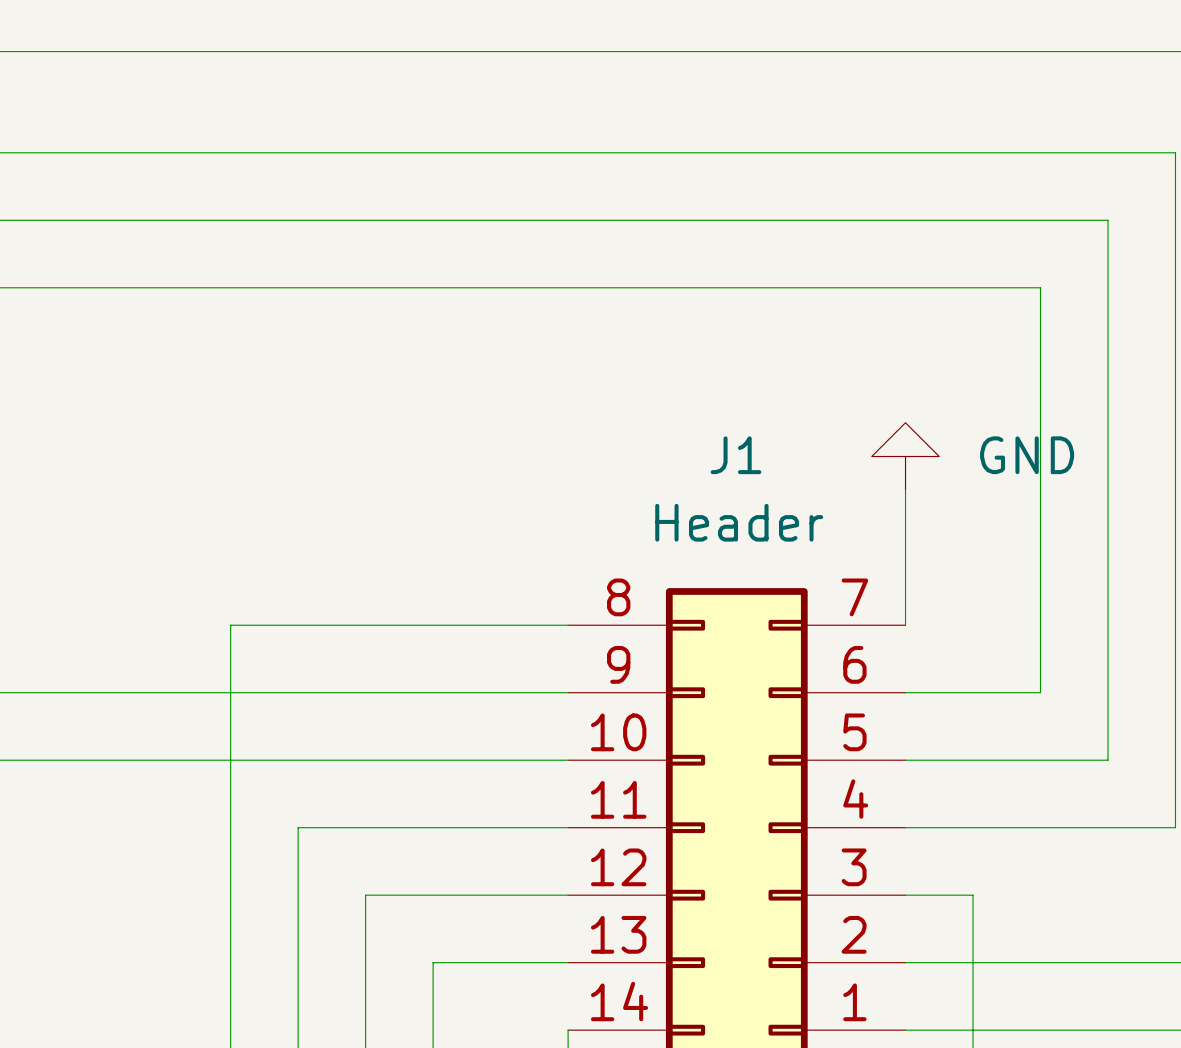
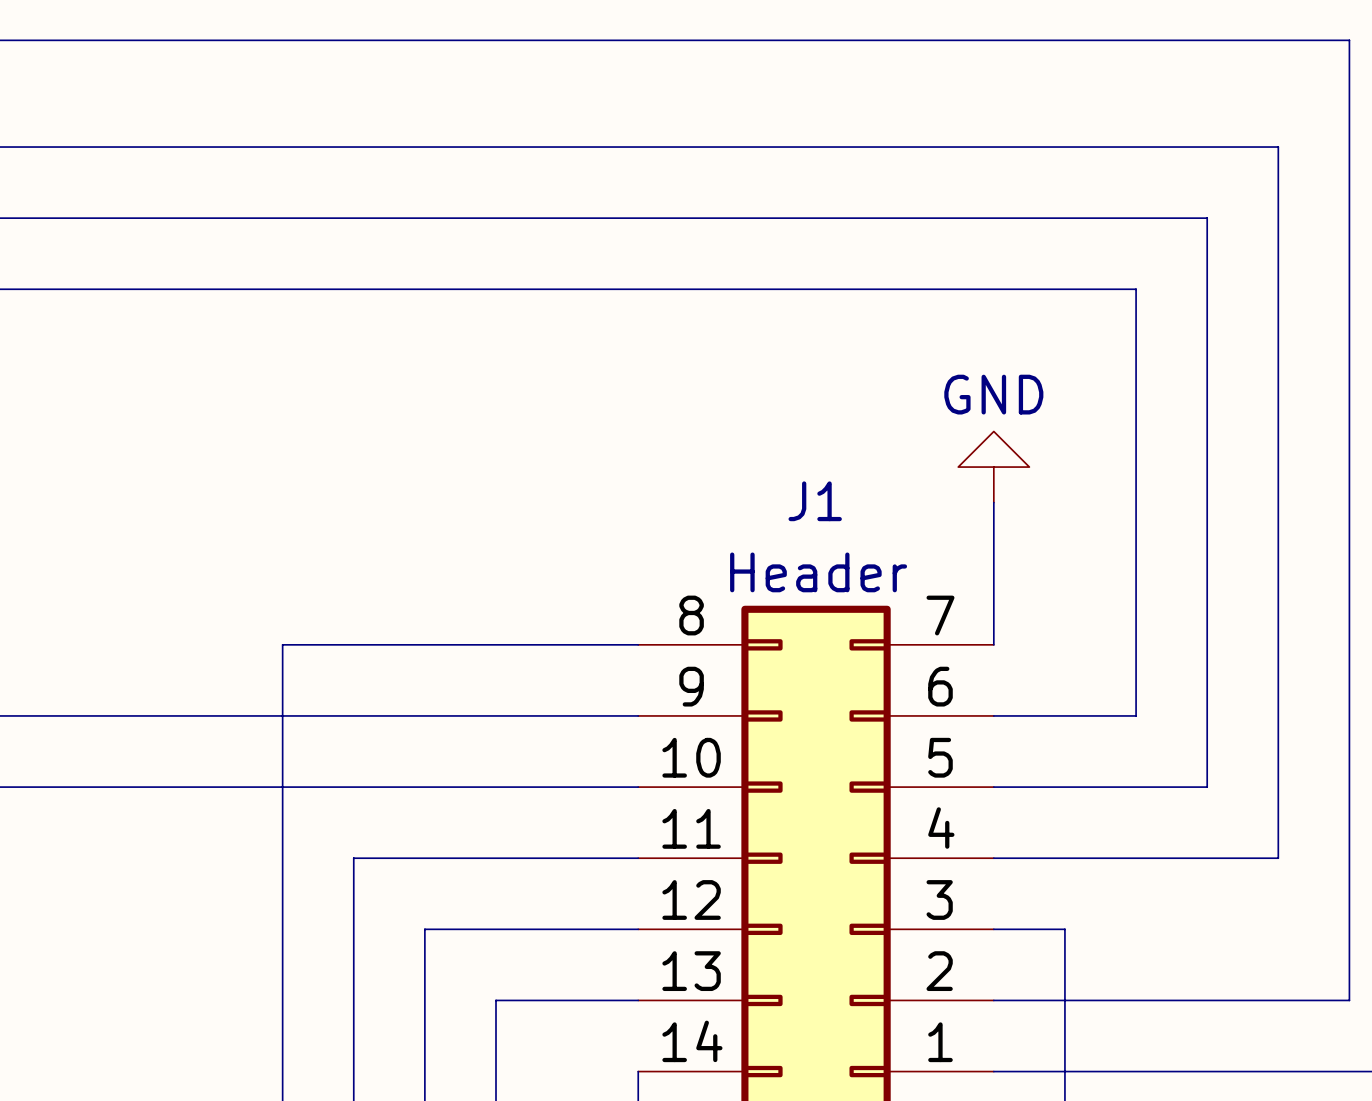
J1 name position: J1 (736, 455) -> J1 (815, 501)
power symbol text position: GND (1027, 455) -> GND (993, 394)
J1 value position: Header (739, 522) -> Header (818, 572)

